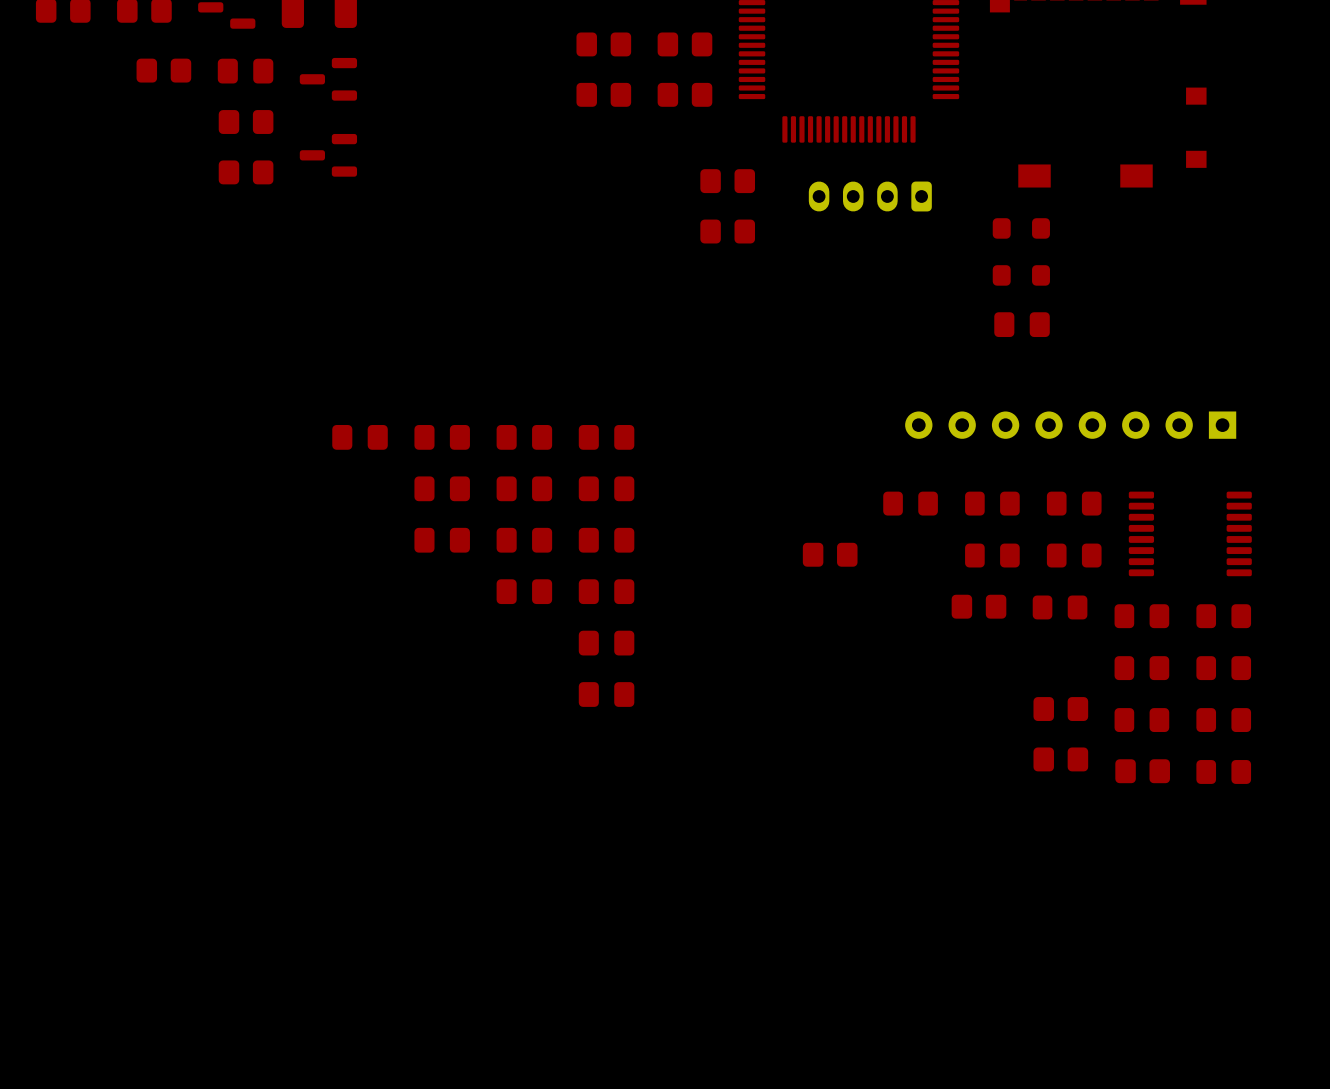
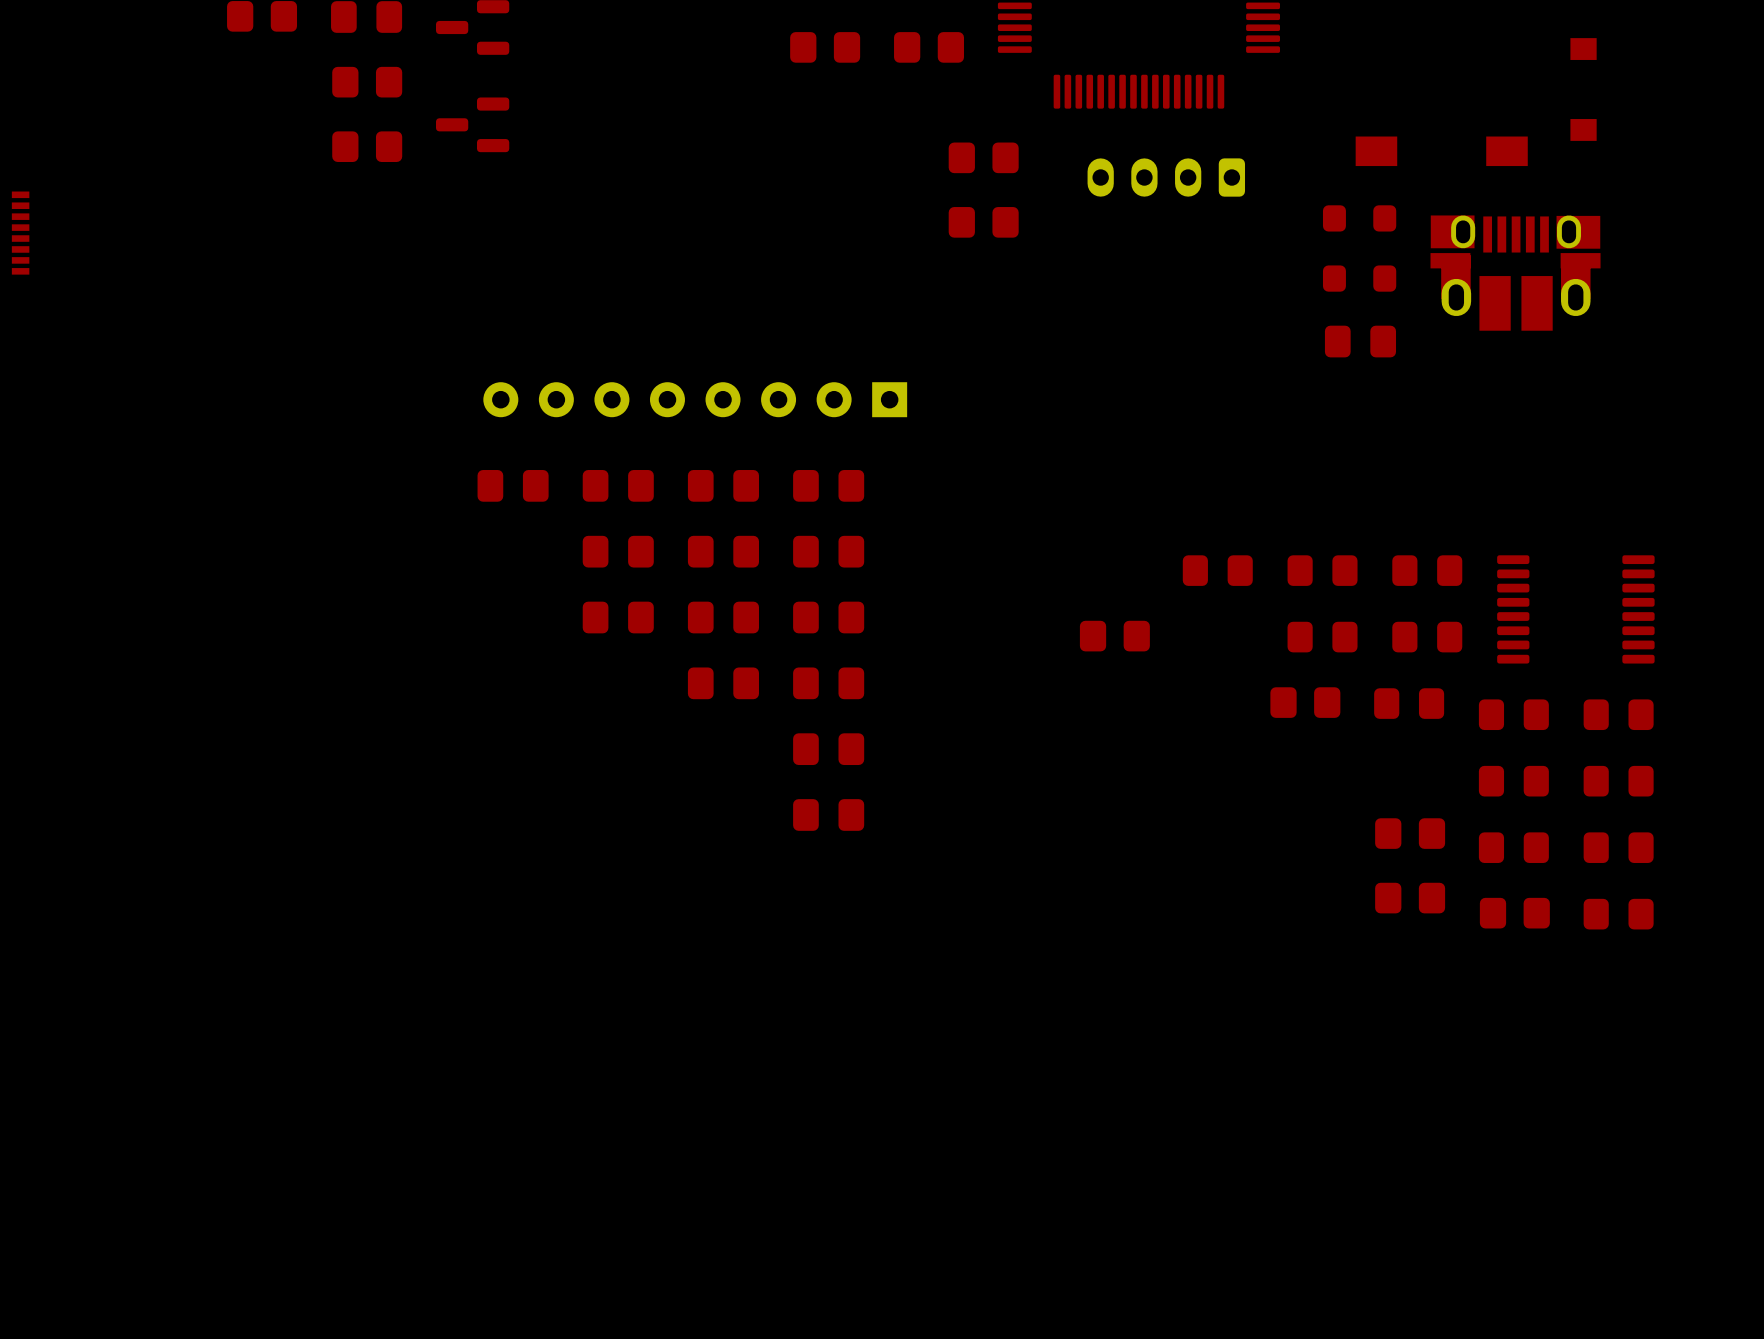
part: none -> (1515, 273)
part: none -> (695, 399)
part: (1070, 425) -> none

